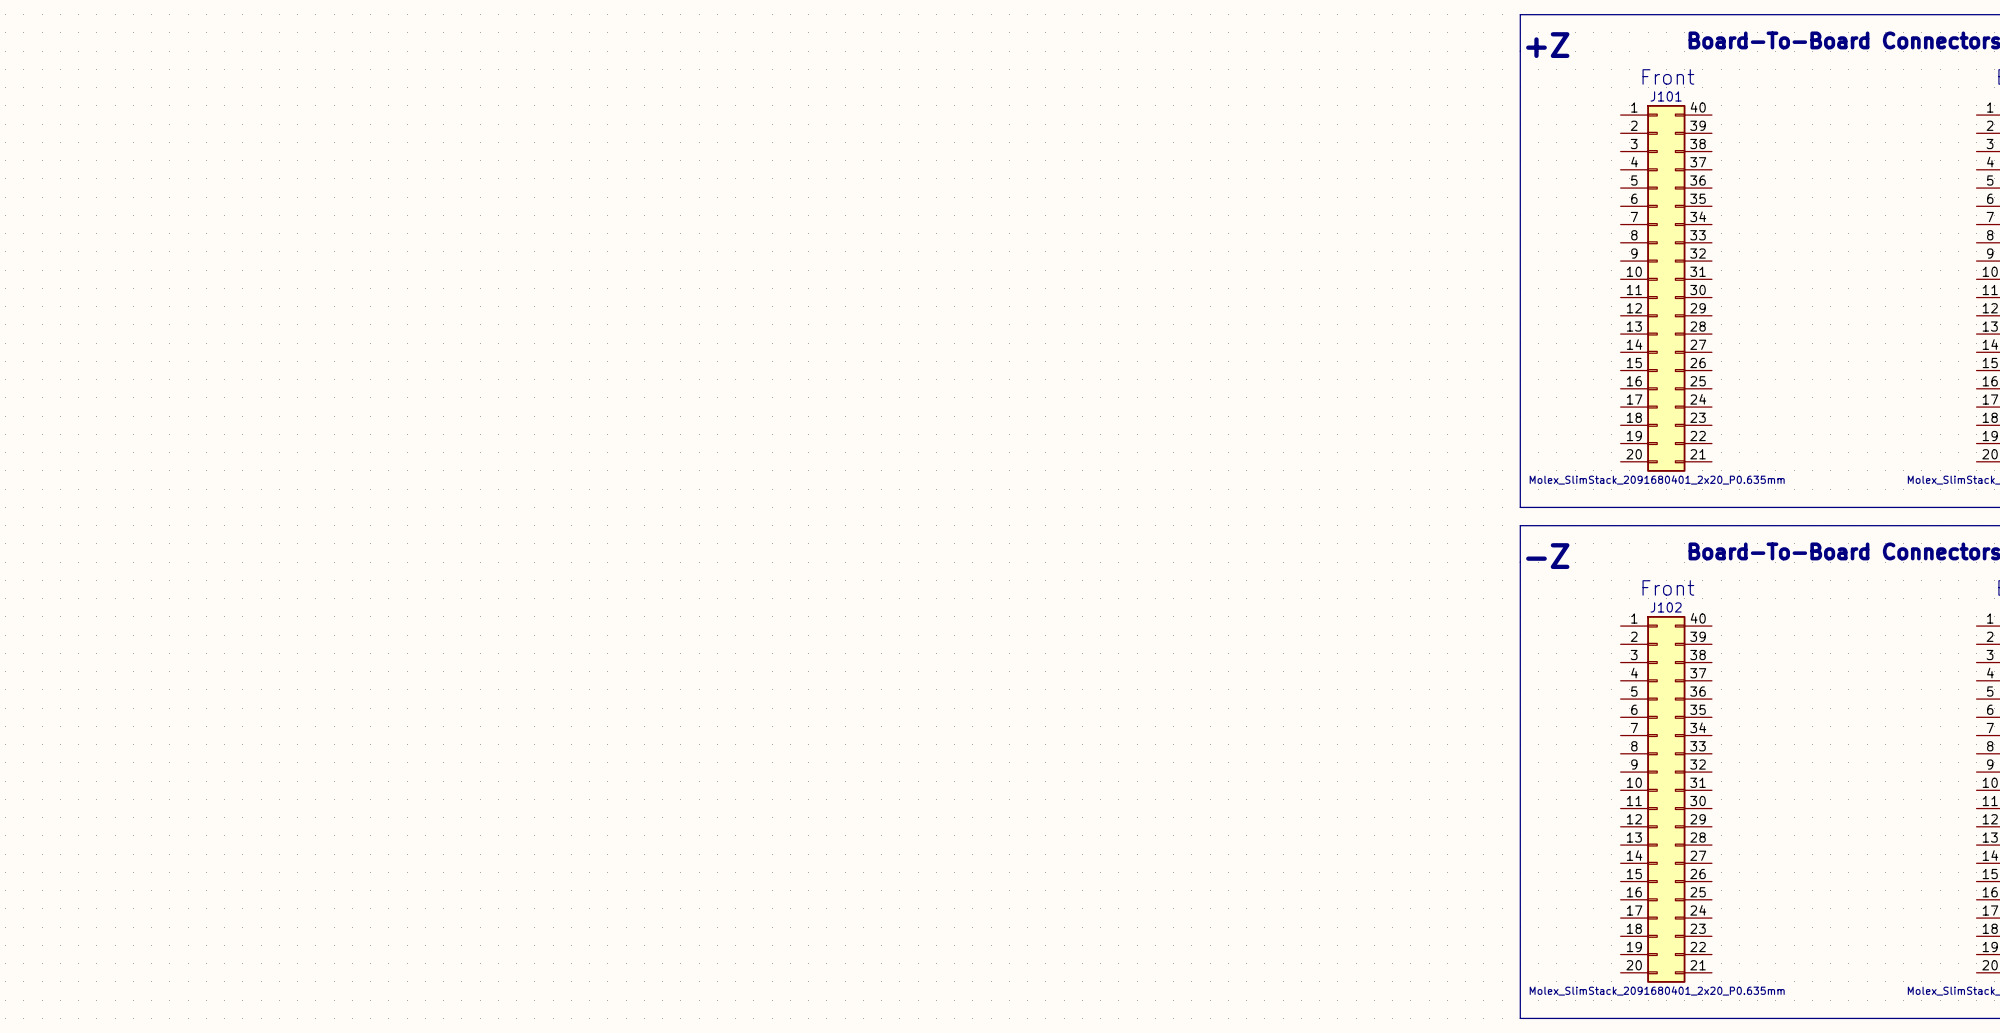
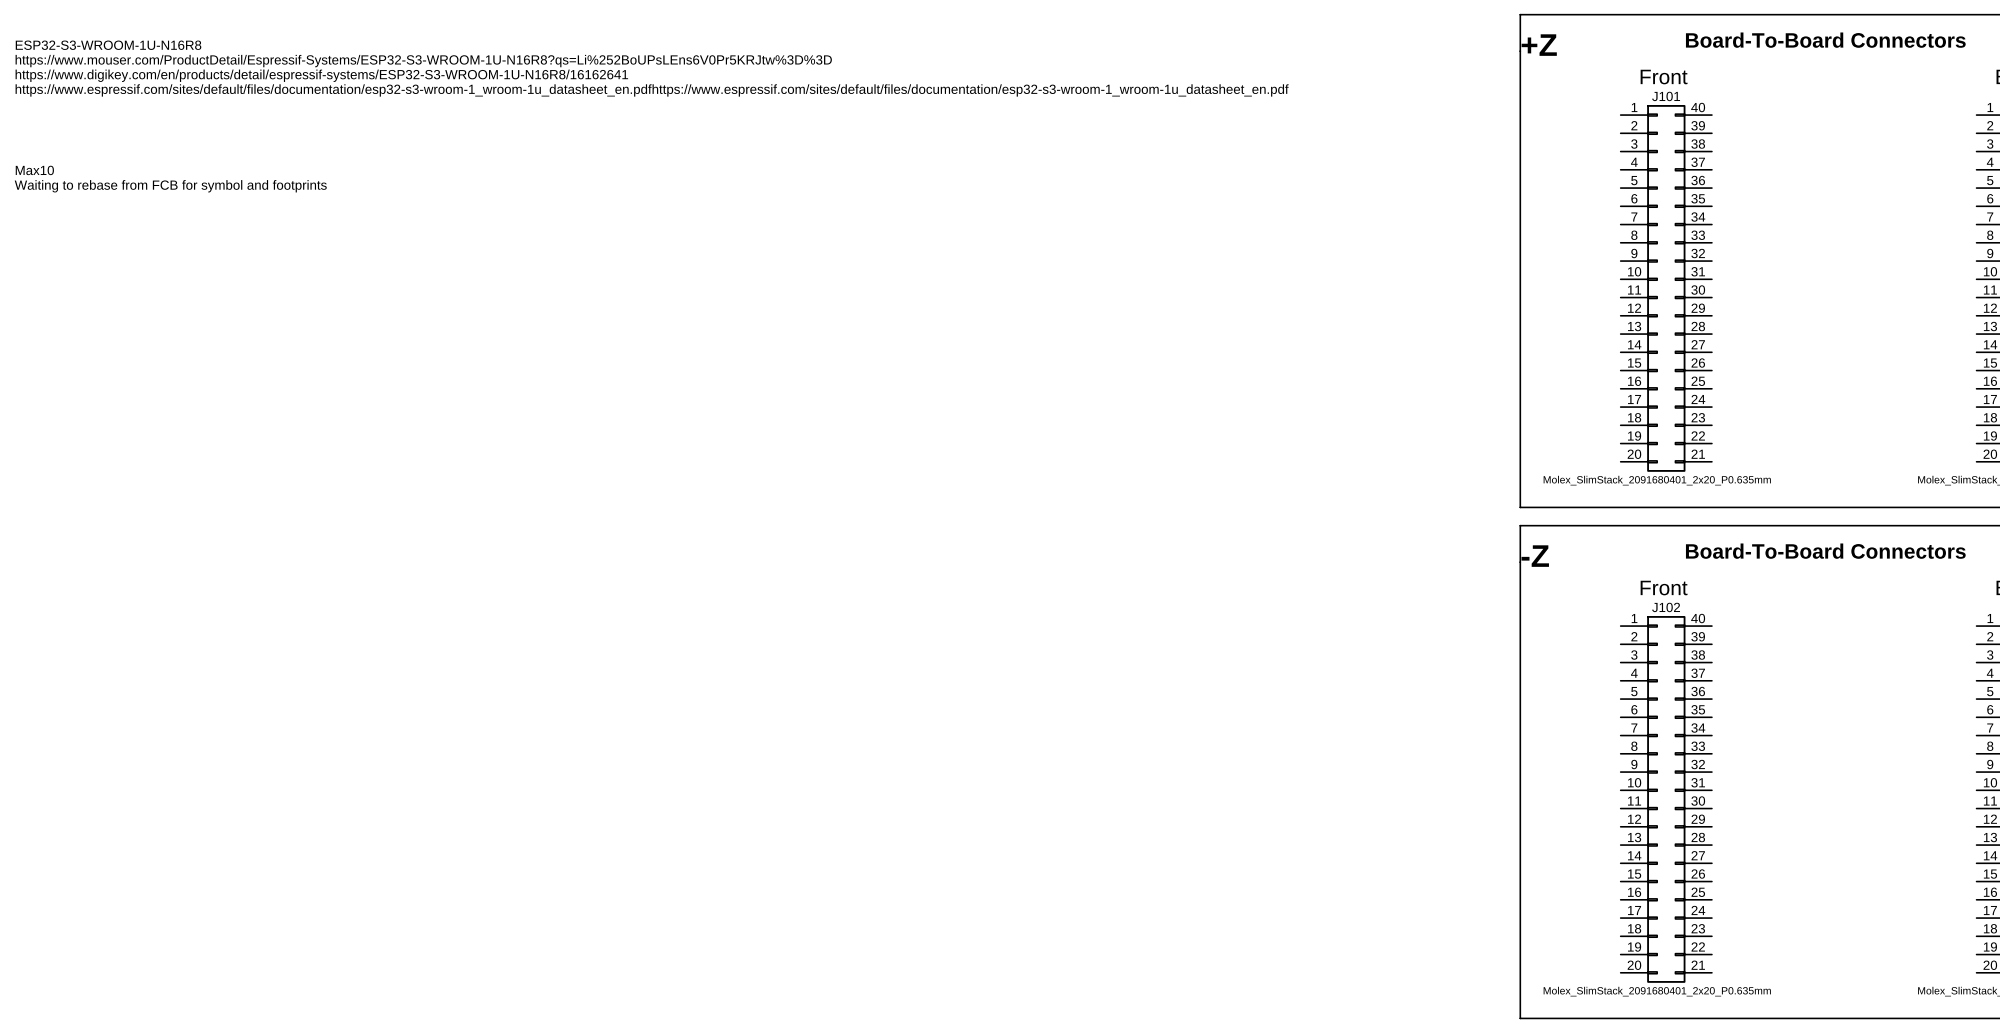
text: none -> ESP32-S3-WROOM-1U-N16R8 (108, 45)
text: none -> https://www.mouser.com/ProductDetail/Espressif-Systems/ESP32-S3-WROOM-1U-N16R8?qs=Li%252BoUPsLEns6V0Pr5KRJtw%3D%3D (423, 61)
text: none -> https://www.digikey.com/en/products/detail/espressif-systems/ESP32-S3-WROOM-1U-N16R8/16162641 (321, 75)
text: none -> https://www.espressif.com/sites/default/files/documentation/esp32-s3-wroom-1_wroom-1u_datasheet_en.pdfhttps://www.espressif.com/sites/default/files/documentation/esp32-s3-wroom-1_wroom-1u_datasheet_en.pdf (652, 90)
text: none -> Max10 (34, 170)
text: none -> Waiting to rebase from FCB for symbol and footprints (170, 186)

